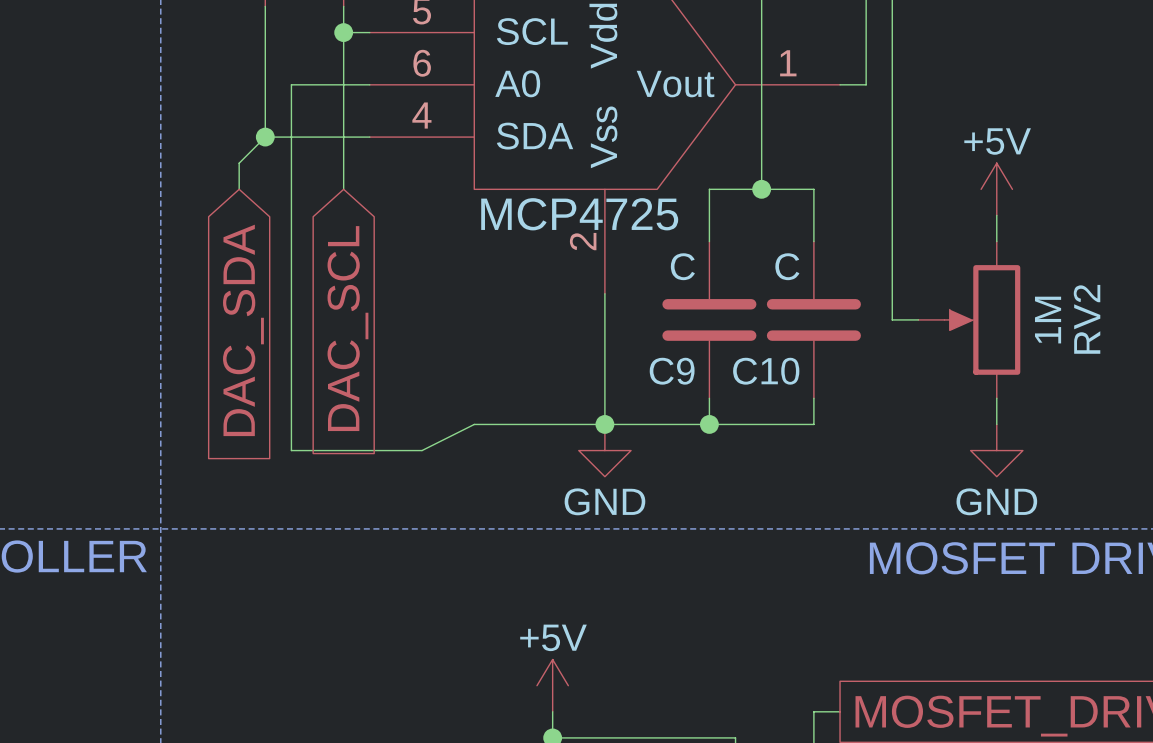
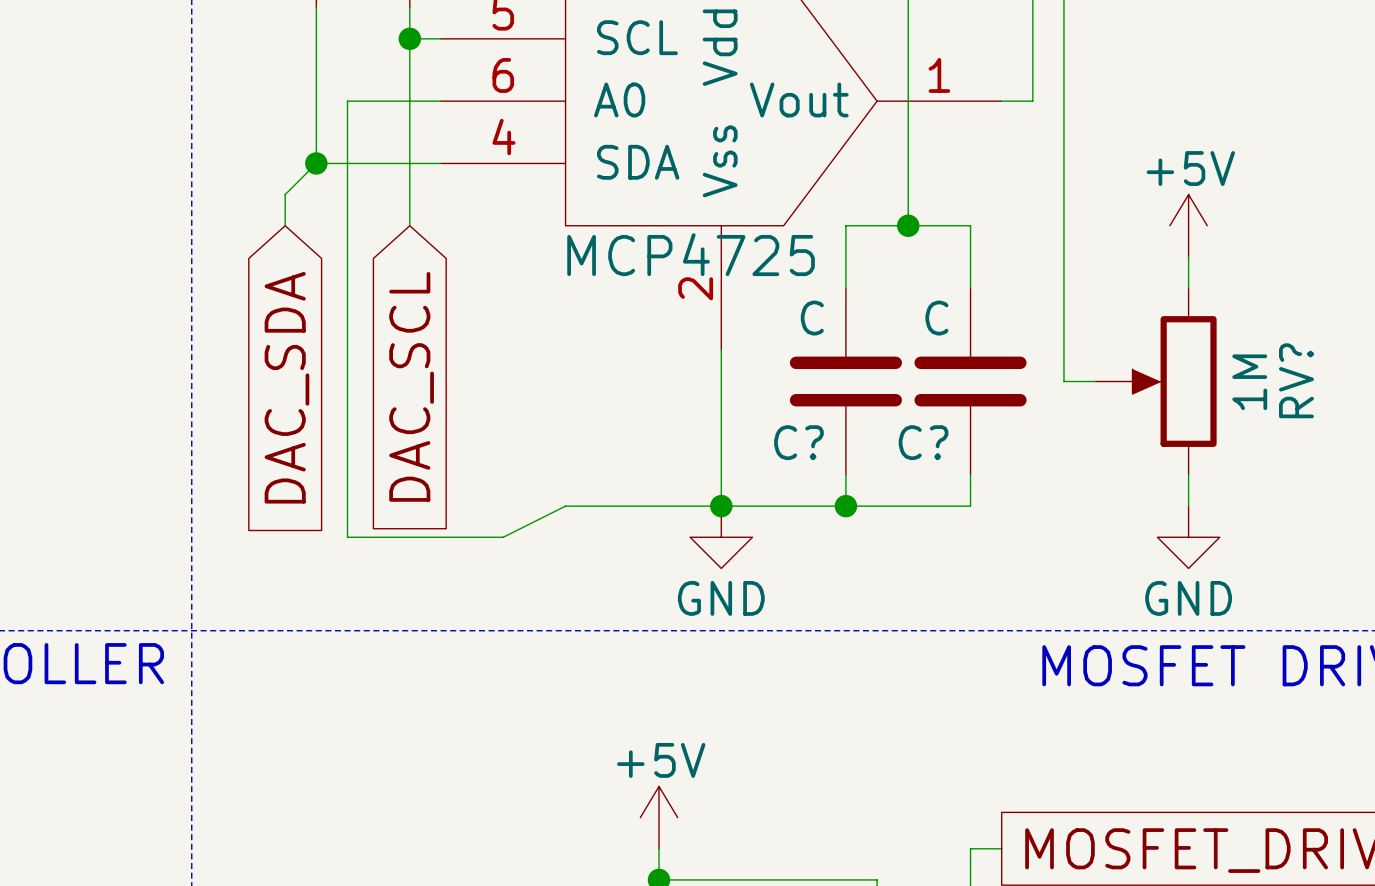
RV2 name: RV2 (1087, 319) -> RV? (1296, 380)
C9 name: C9 (672, 371) -> C? (798, 442)
C10 name: C10 (766, 371) -> C? (923, 442)

